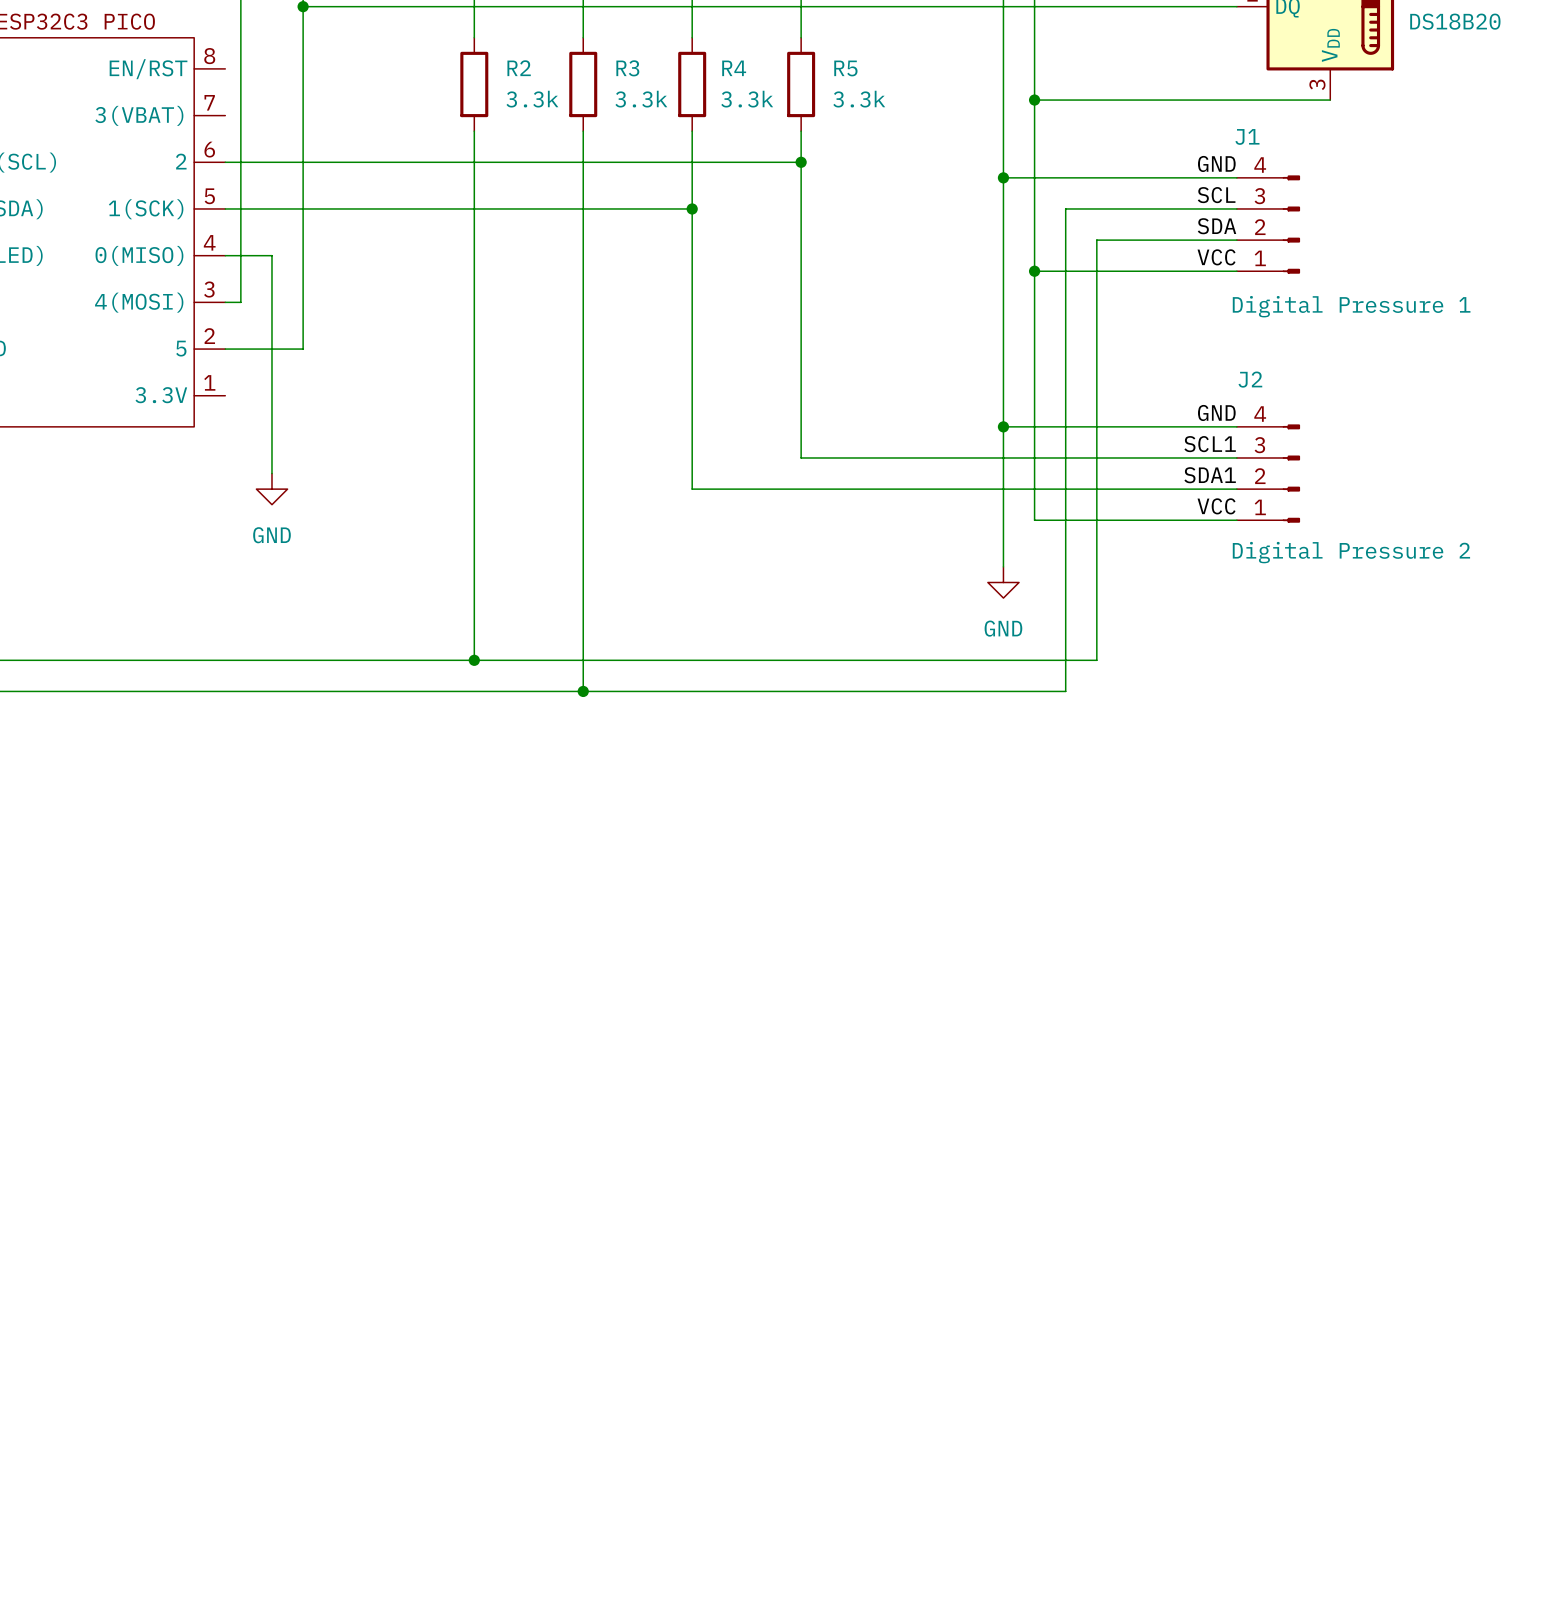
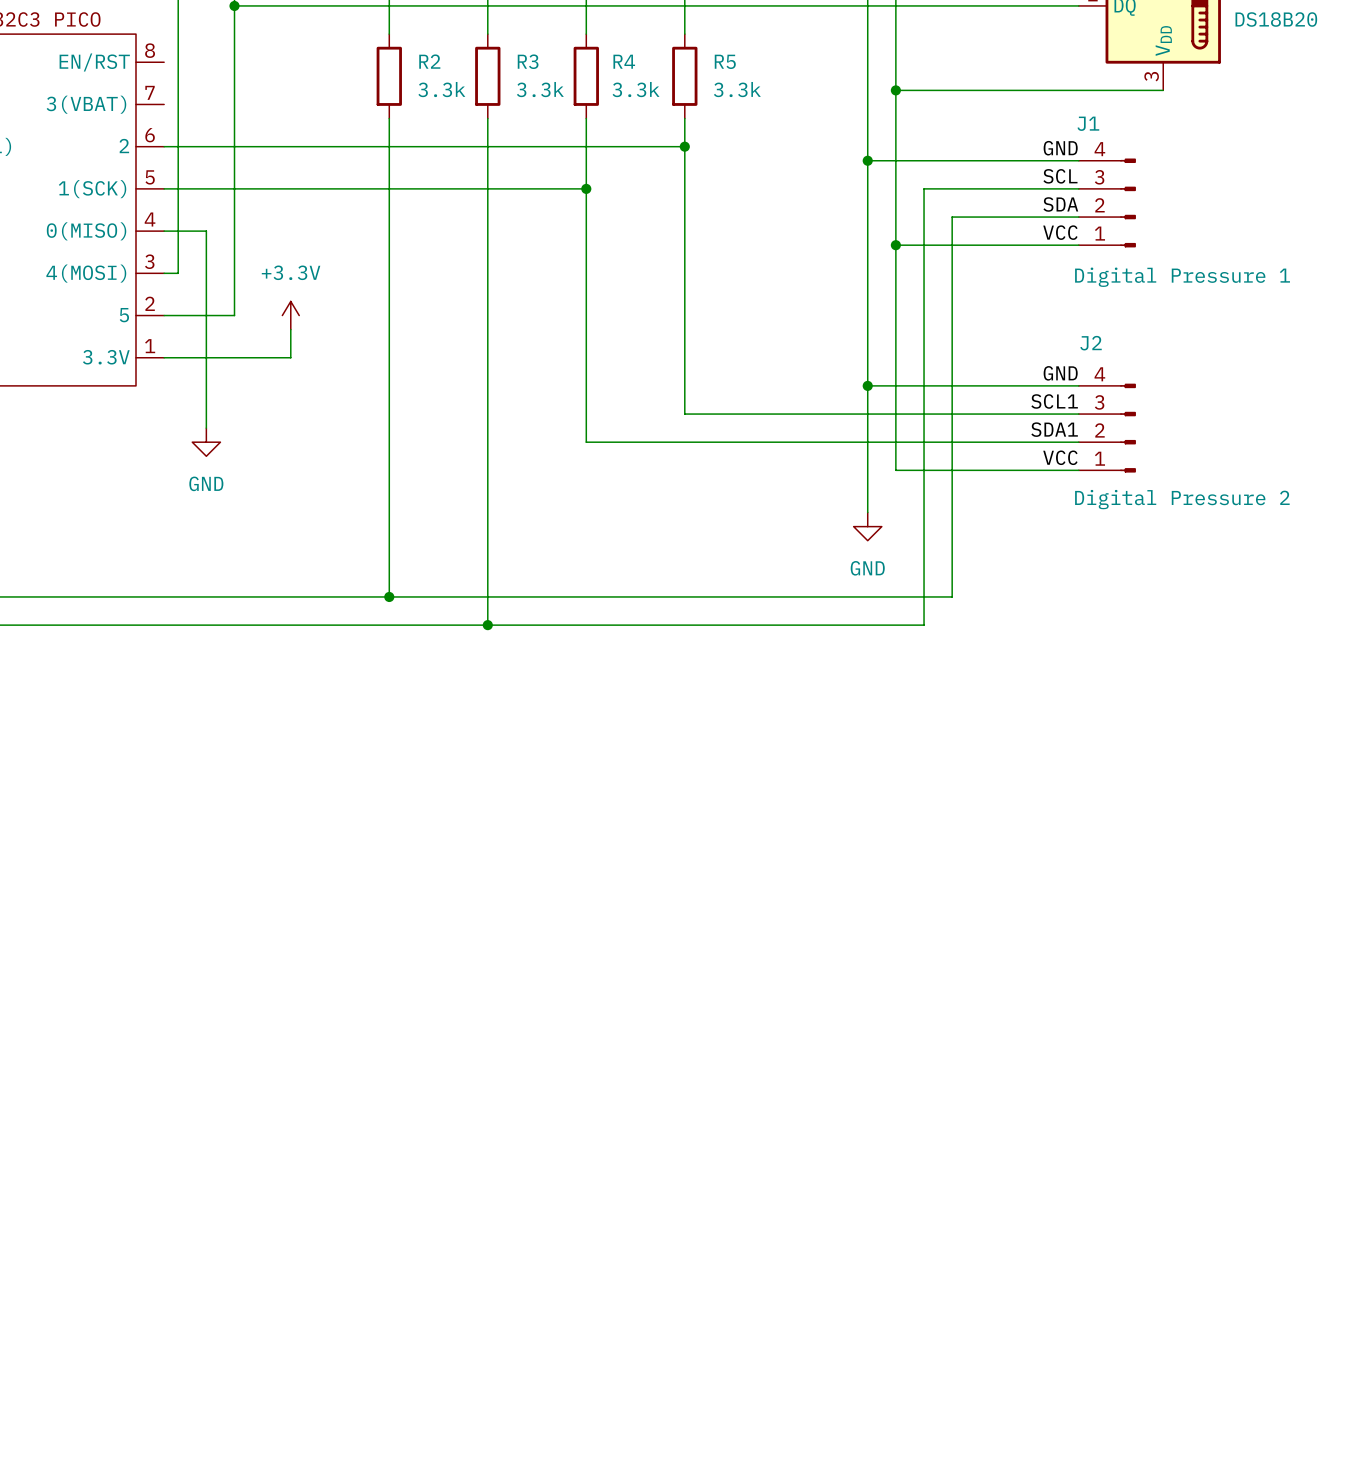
power symbol: none -> +3.3V (290, 315)
wire: none -> (290, 329) (290, 357) (164, 357)

